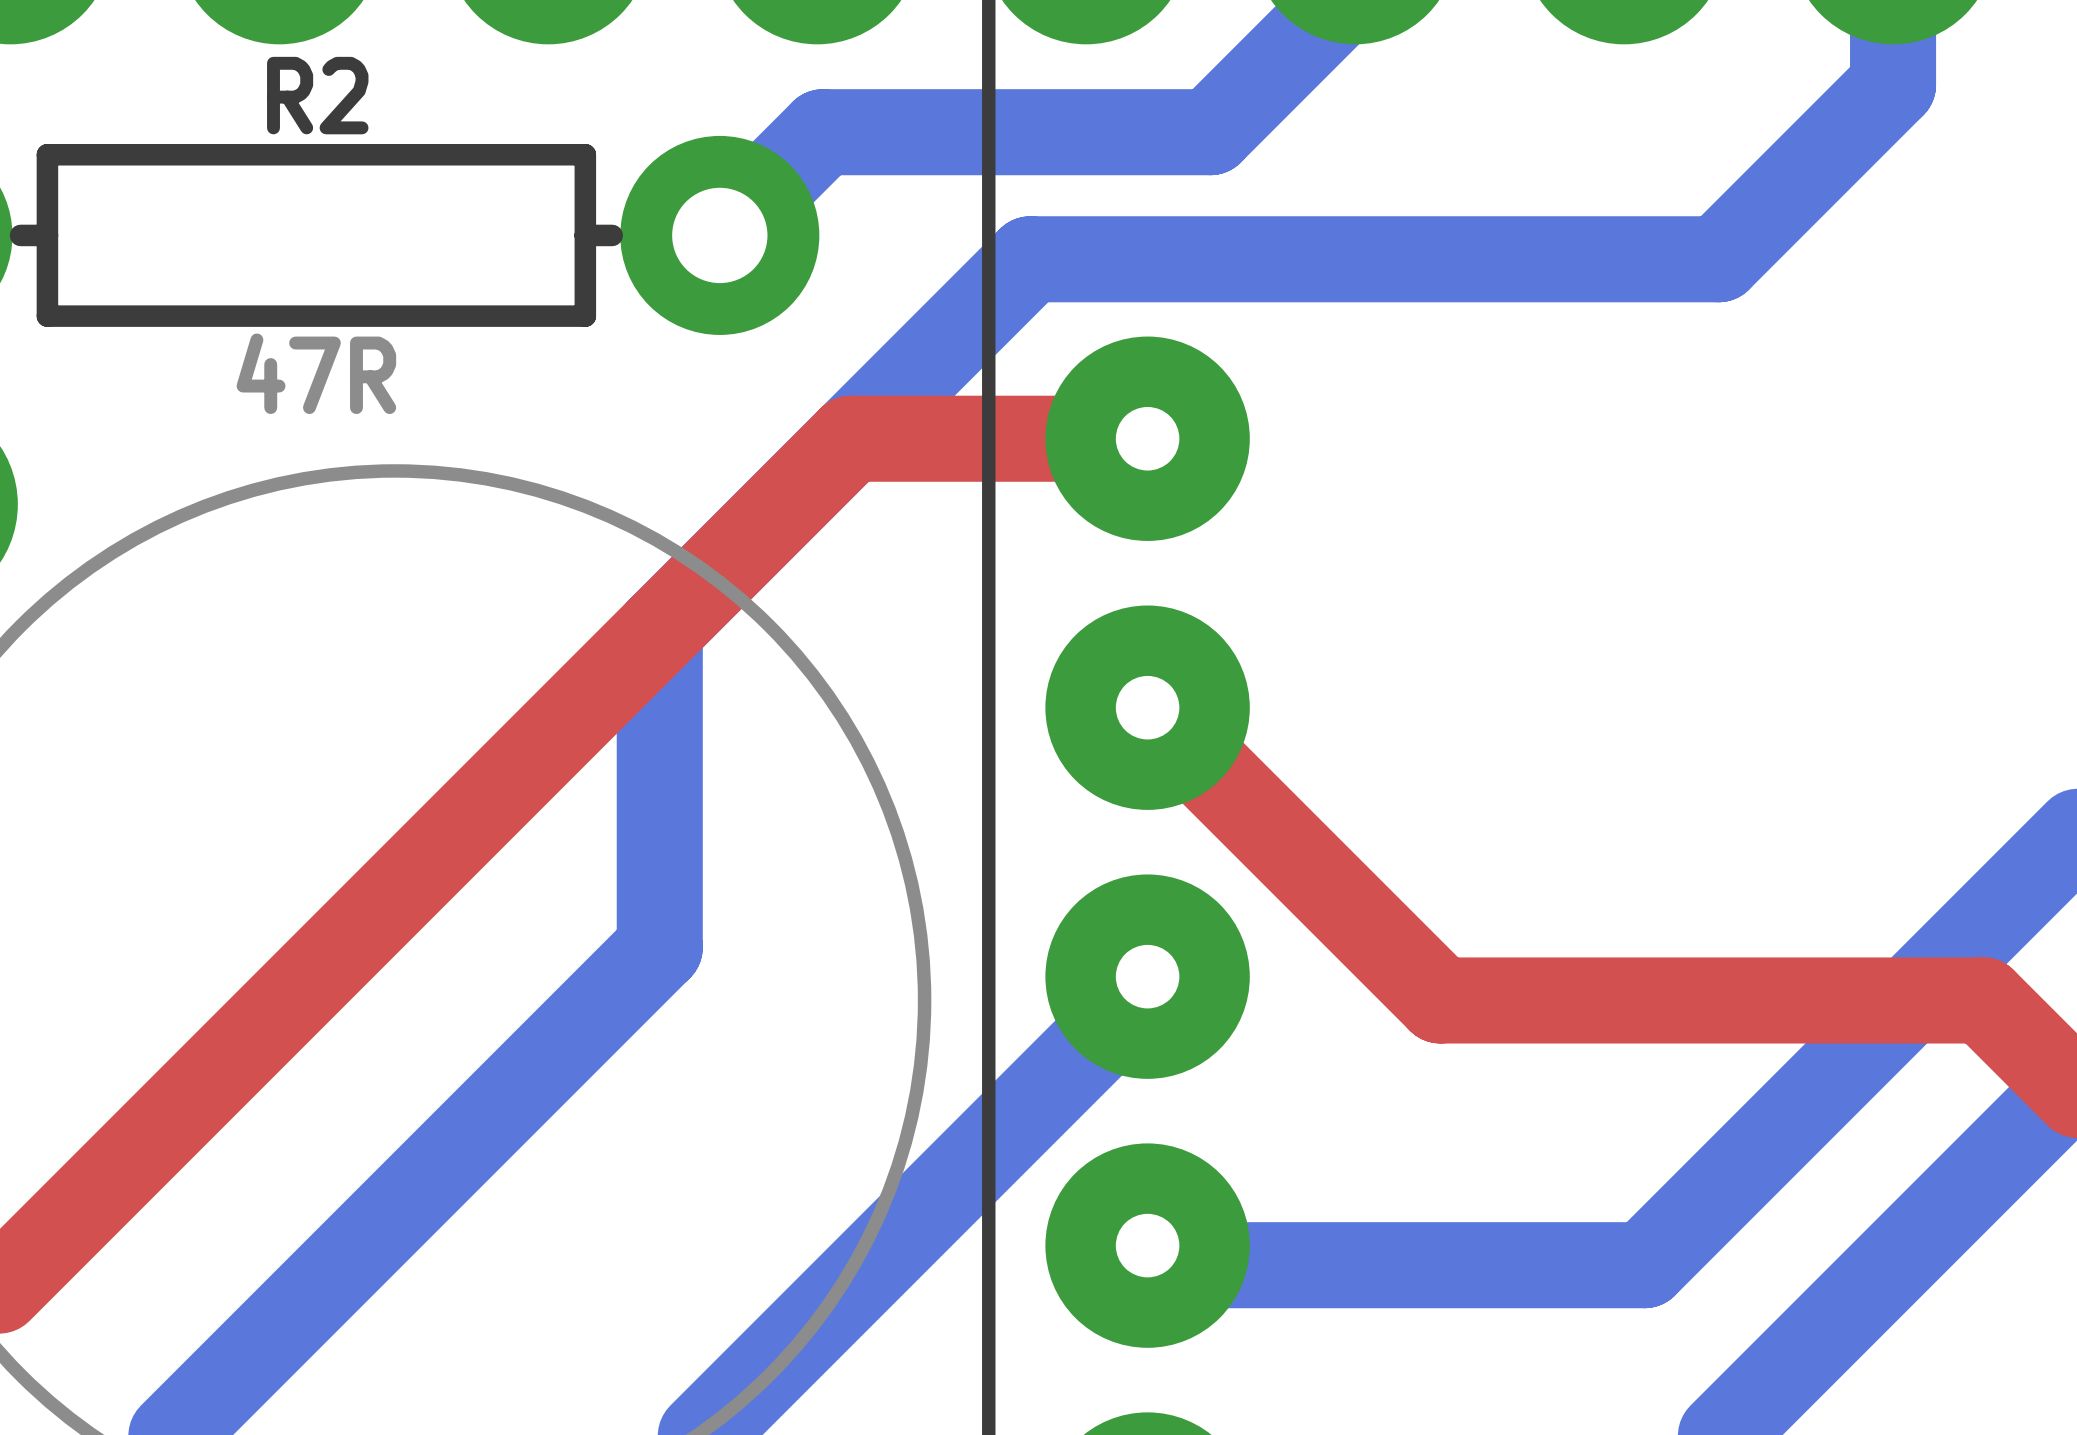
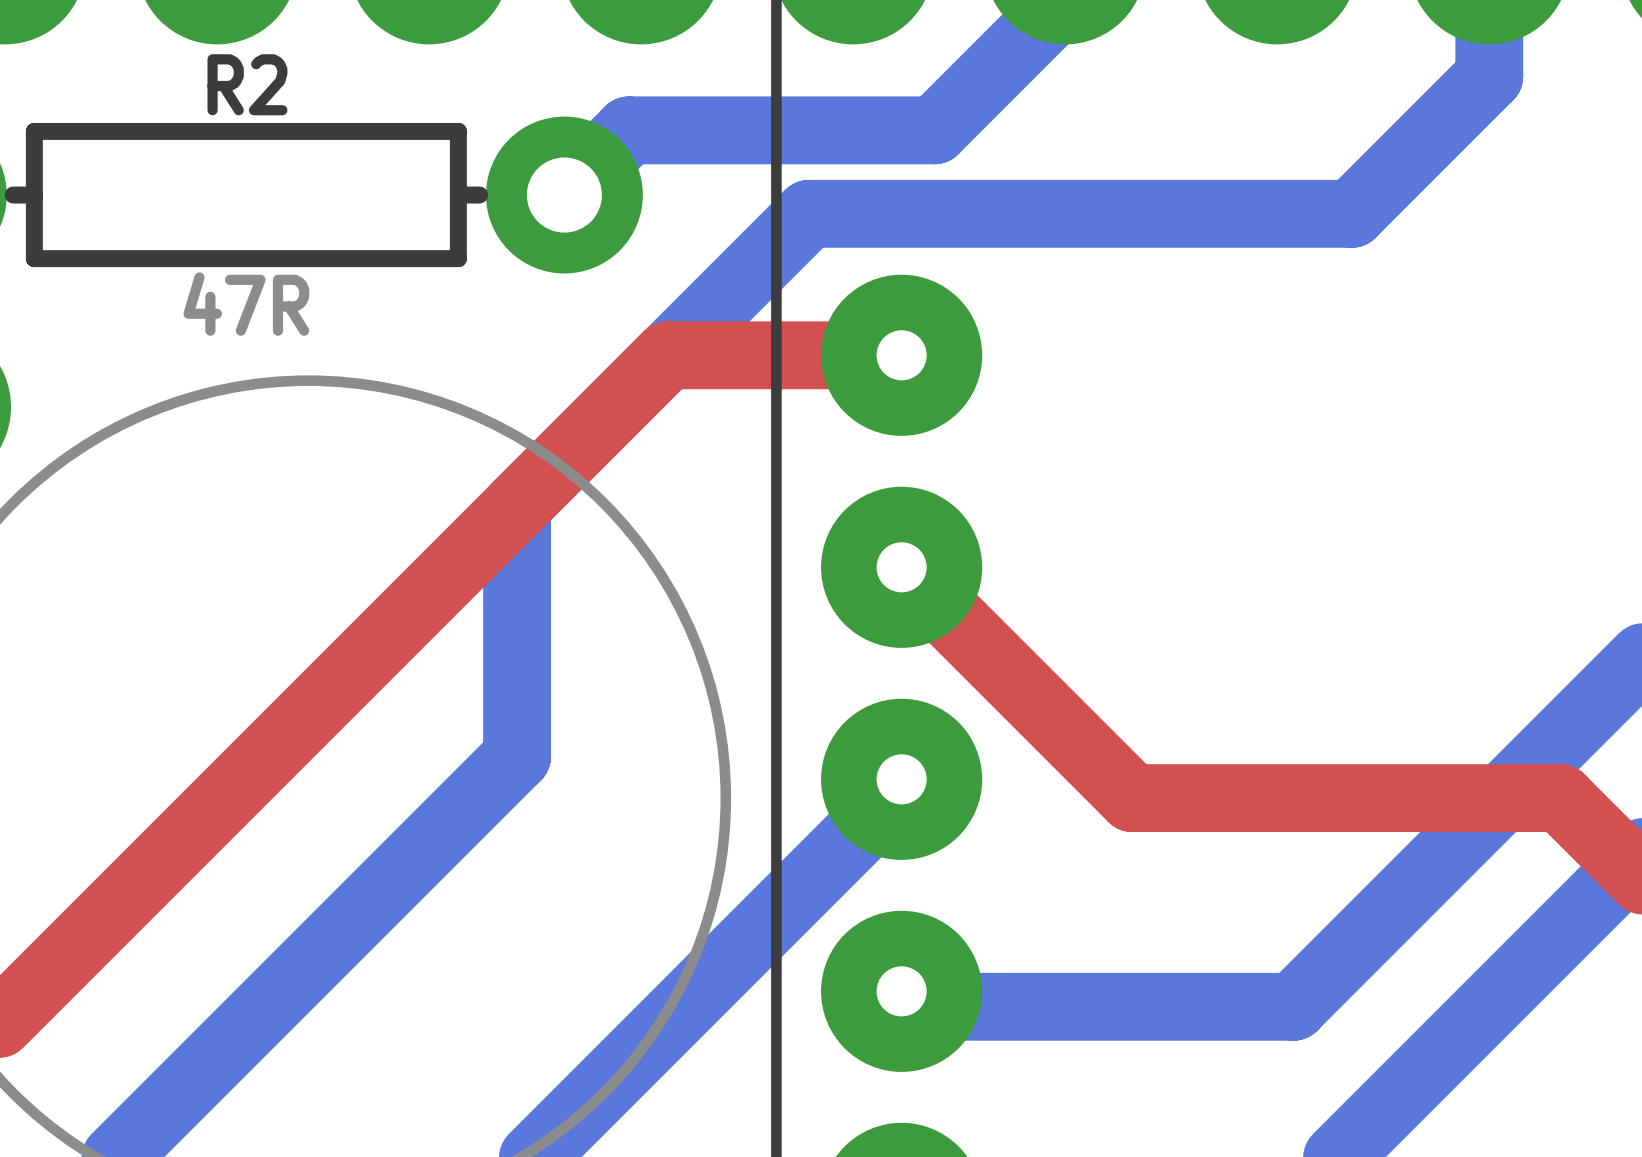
bottom track: (1210, 132) (823, 132) (801, 153) -> (951, 113) (934, 130) (629, 130)

